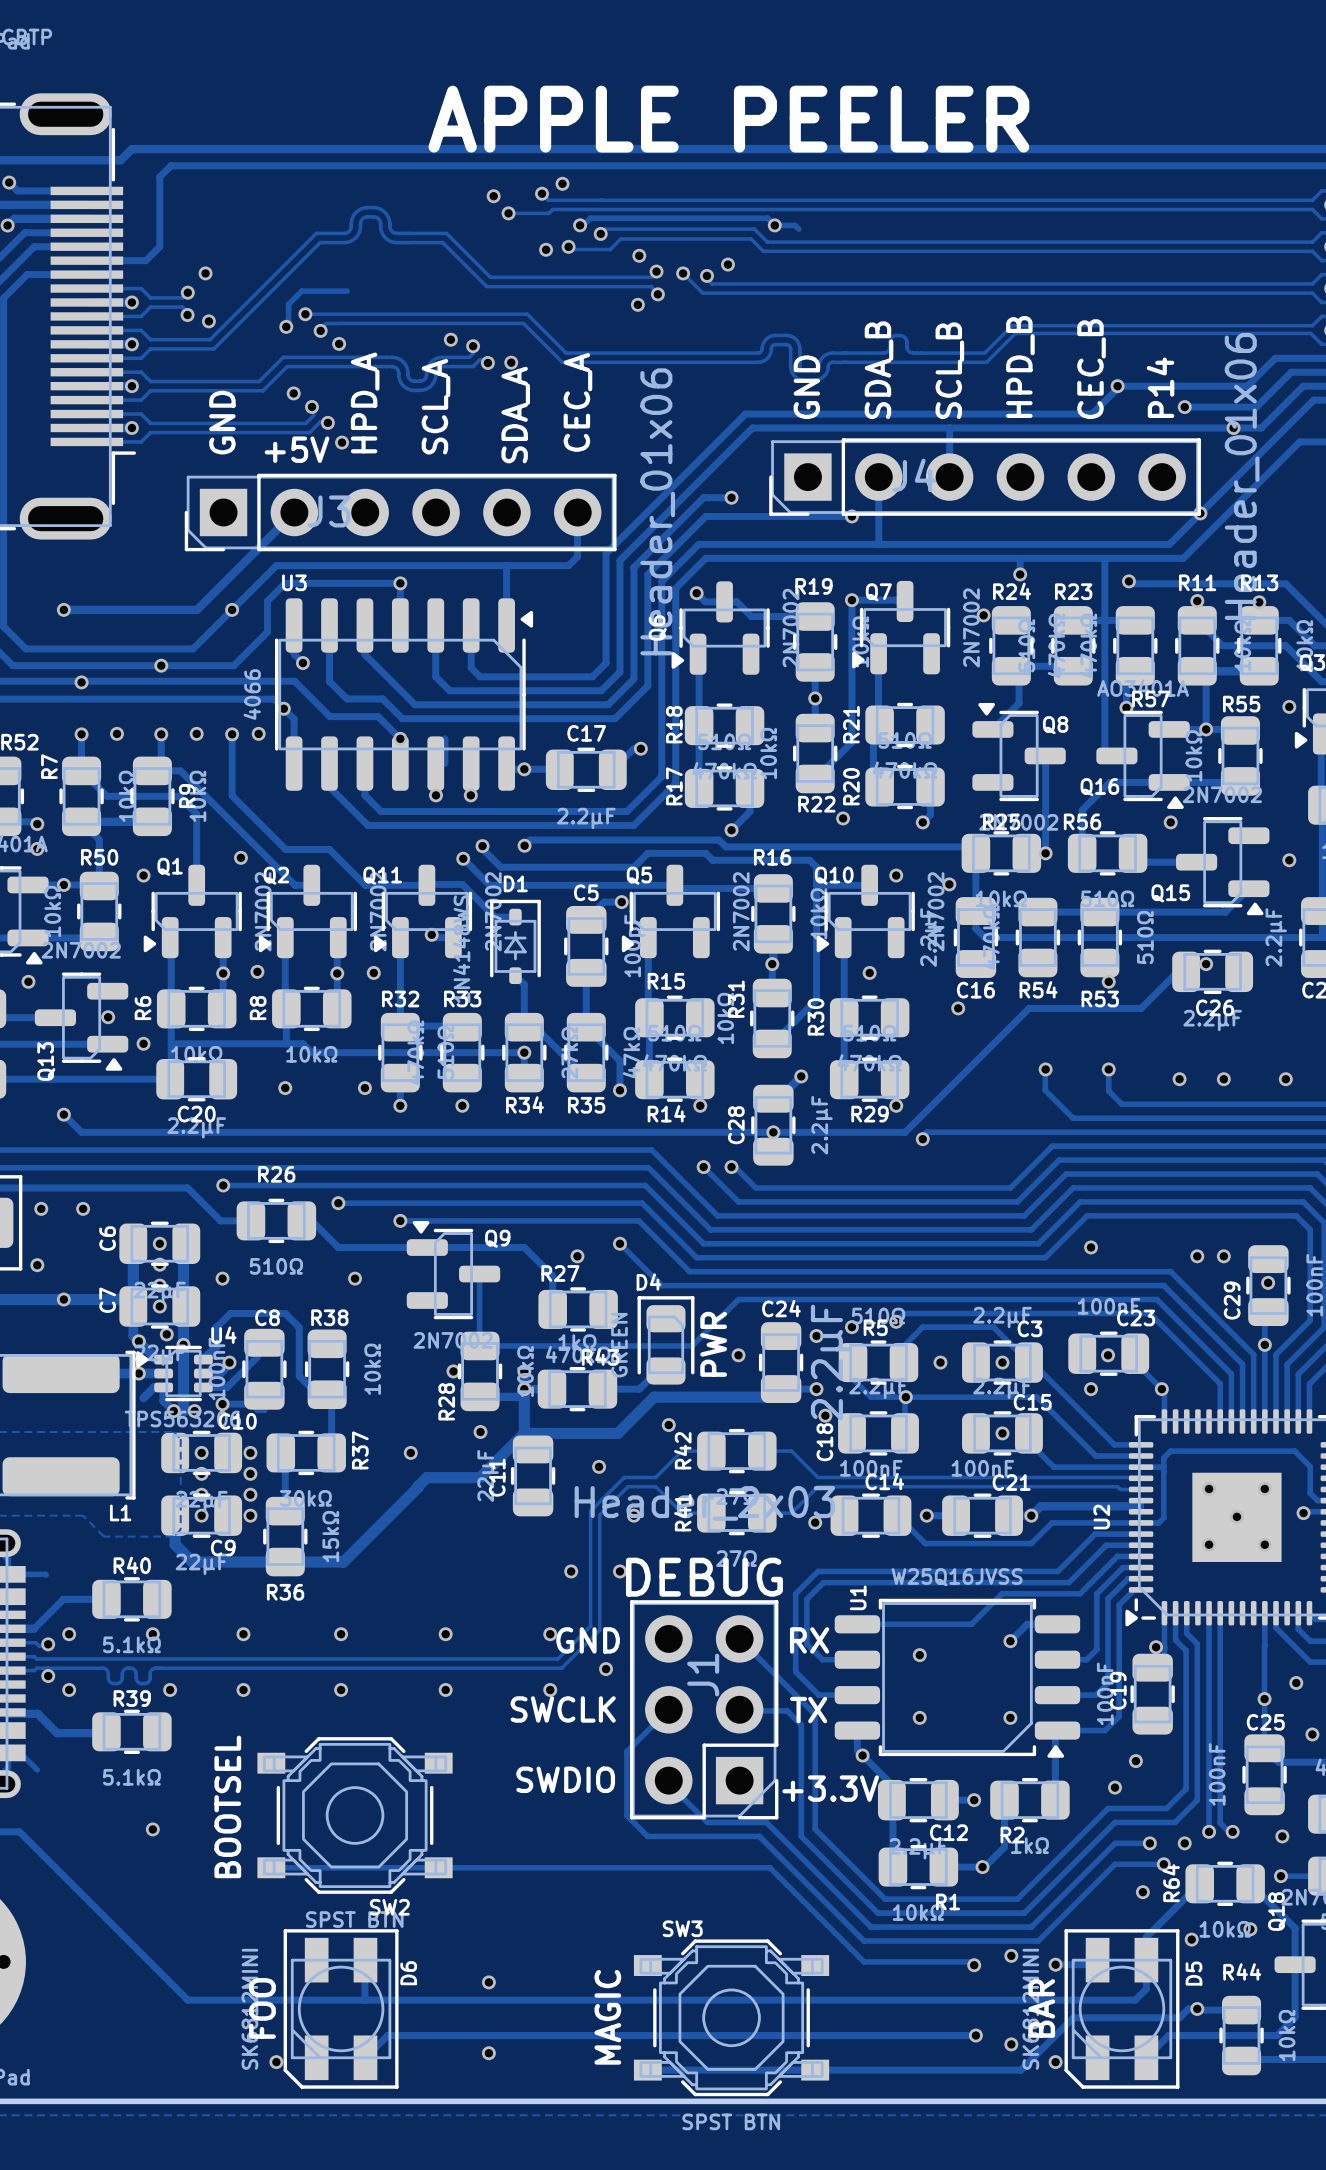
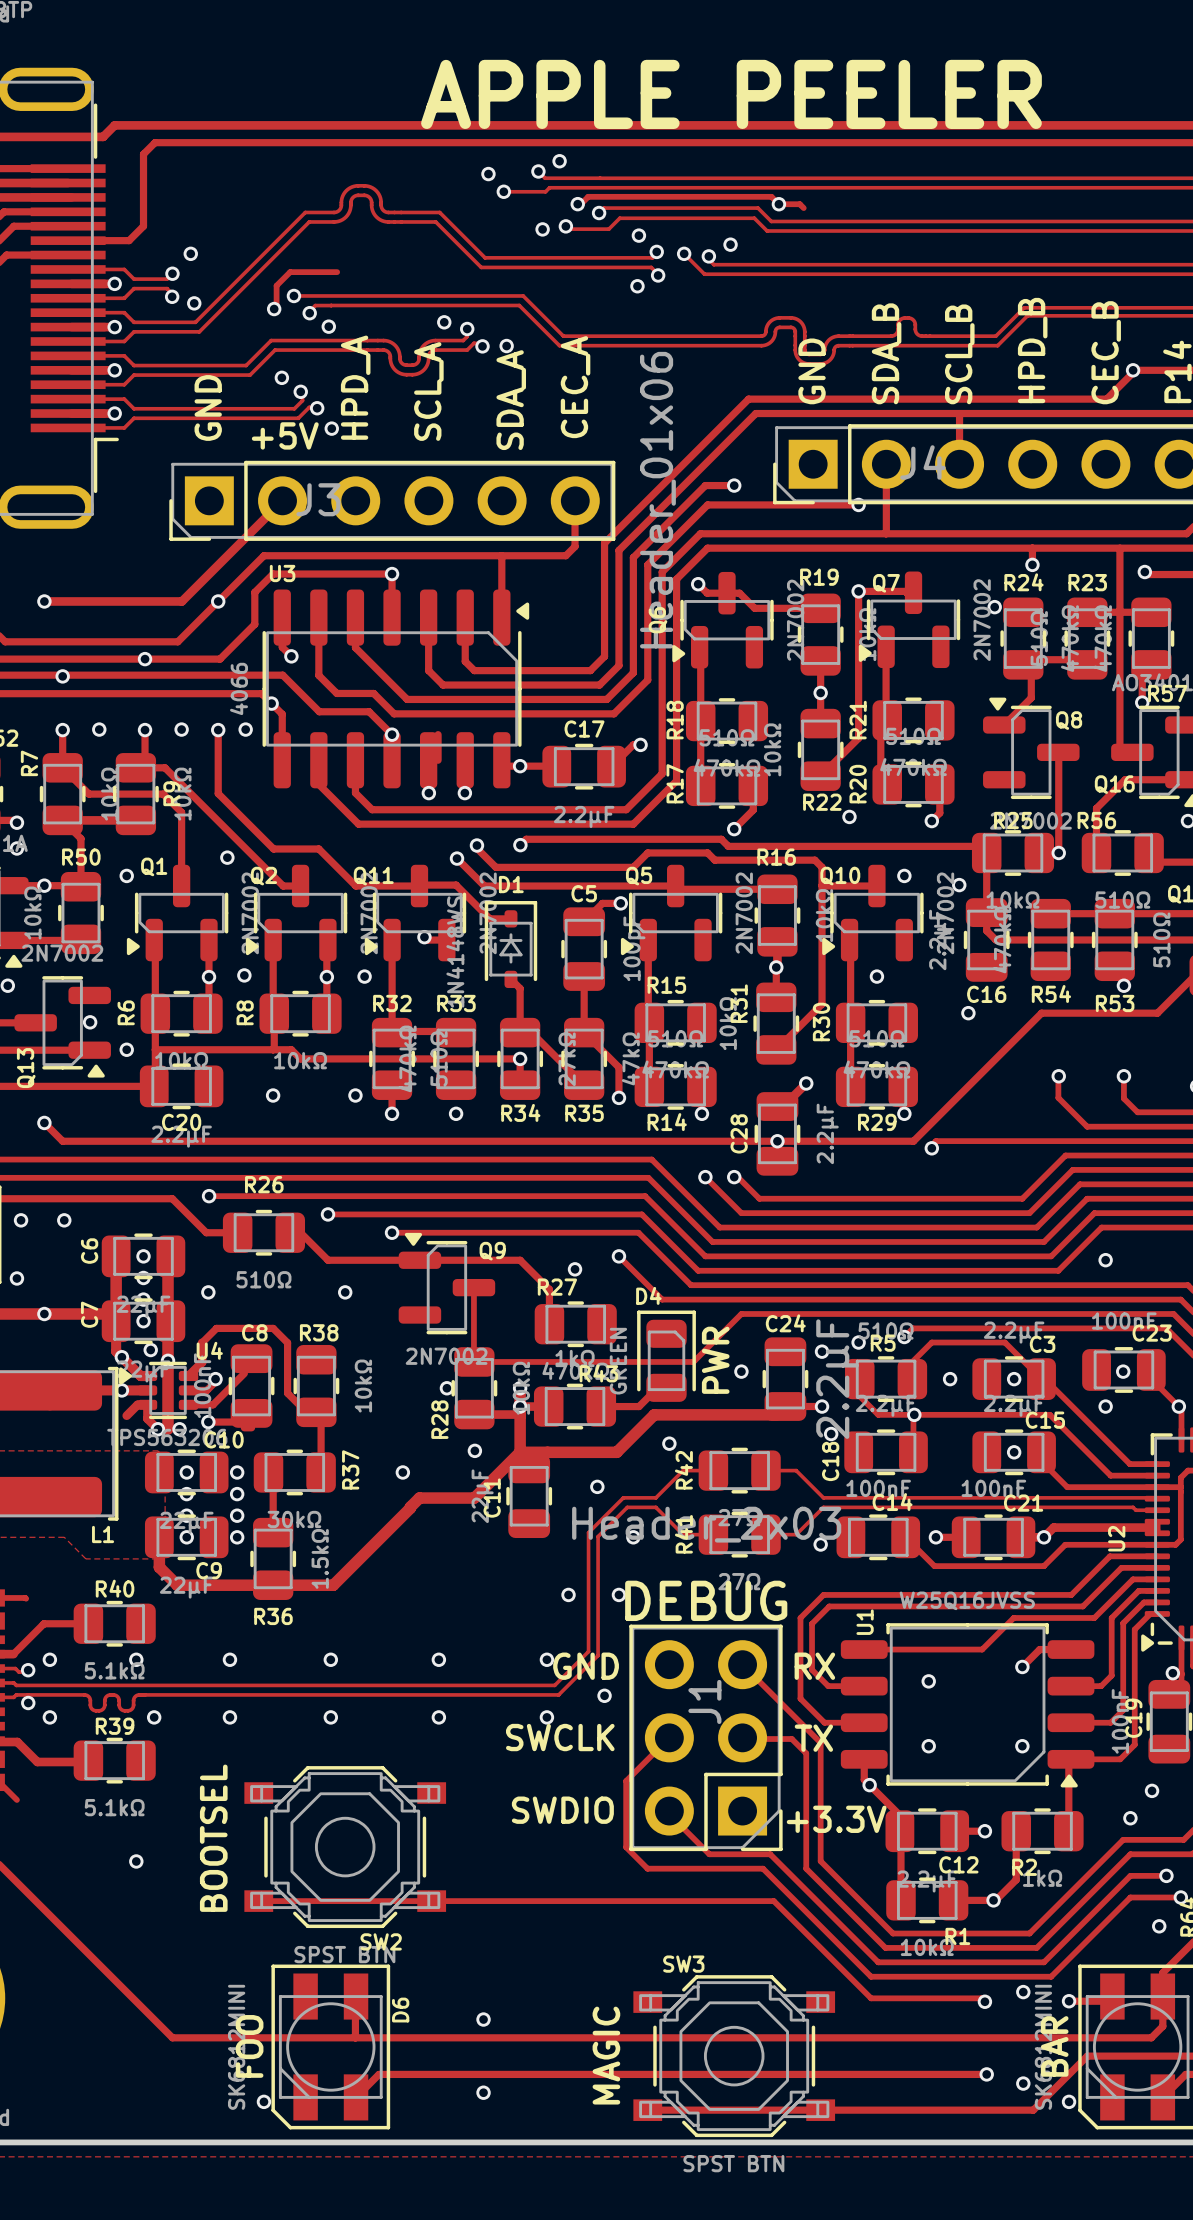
R36 value: 15kΩ (330, 1536) -> 1.5kΩ (320, 1558)

